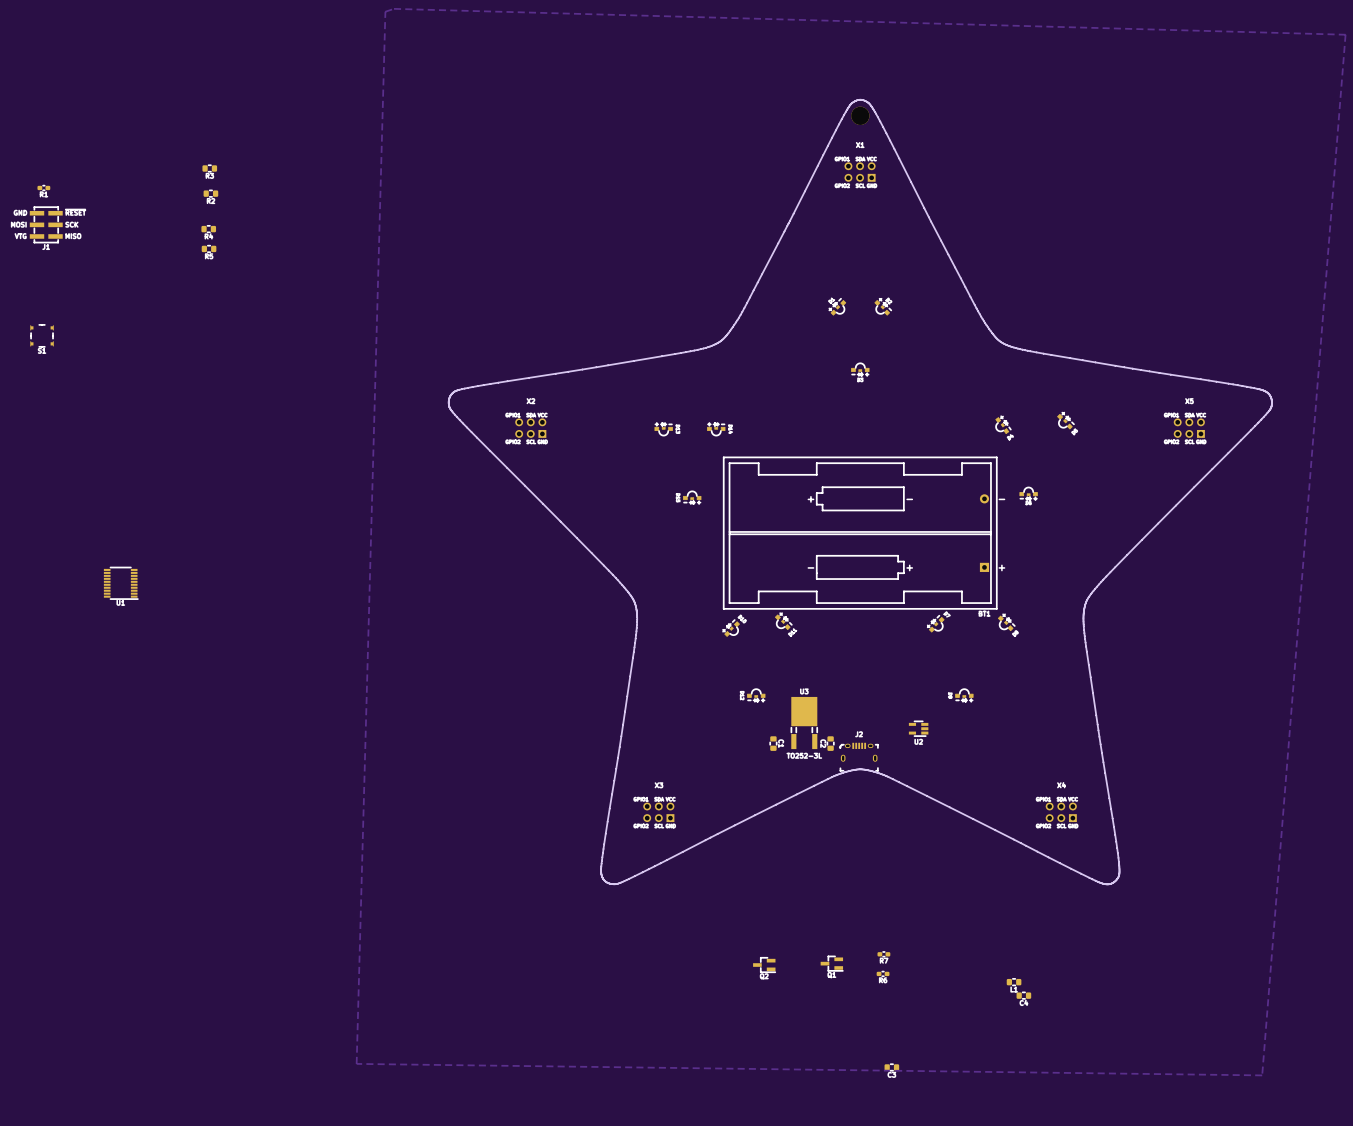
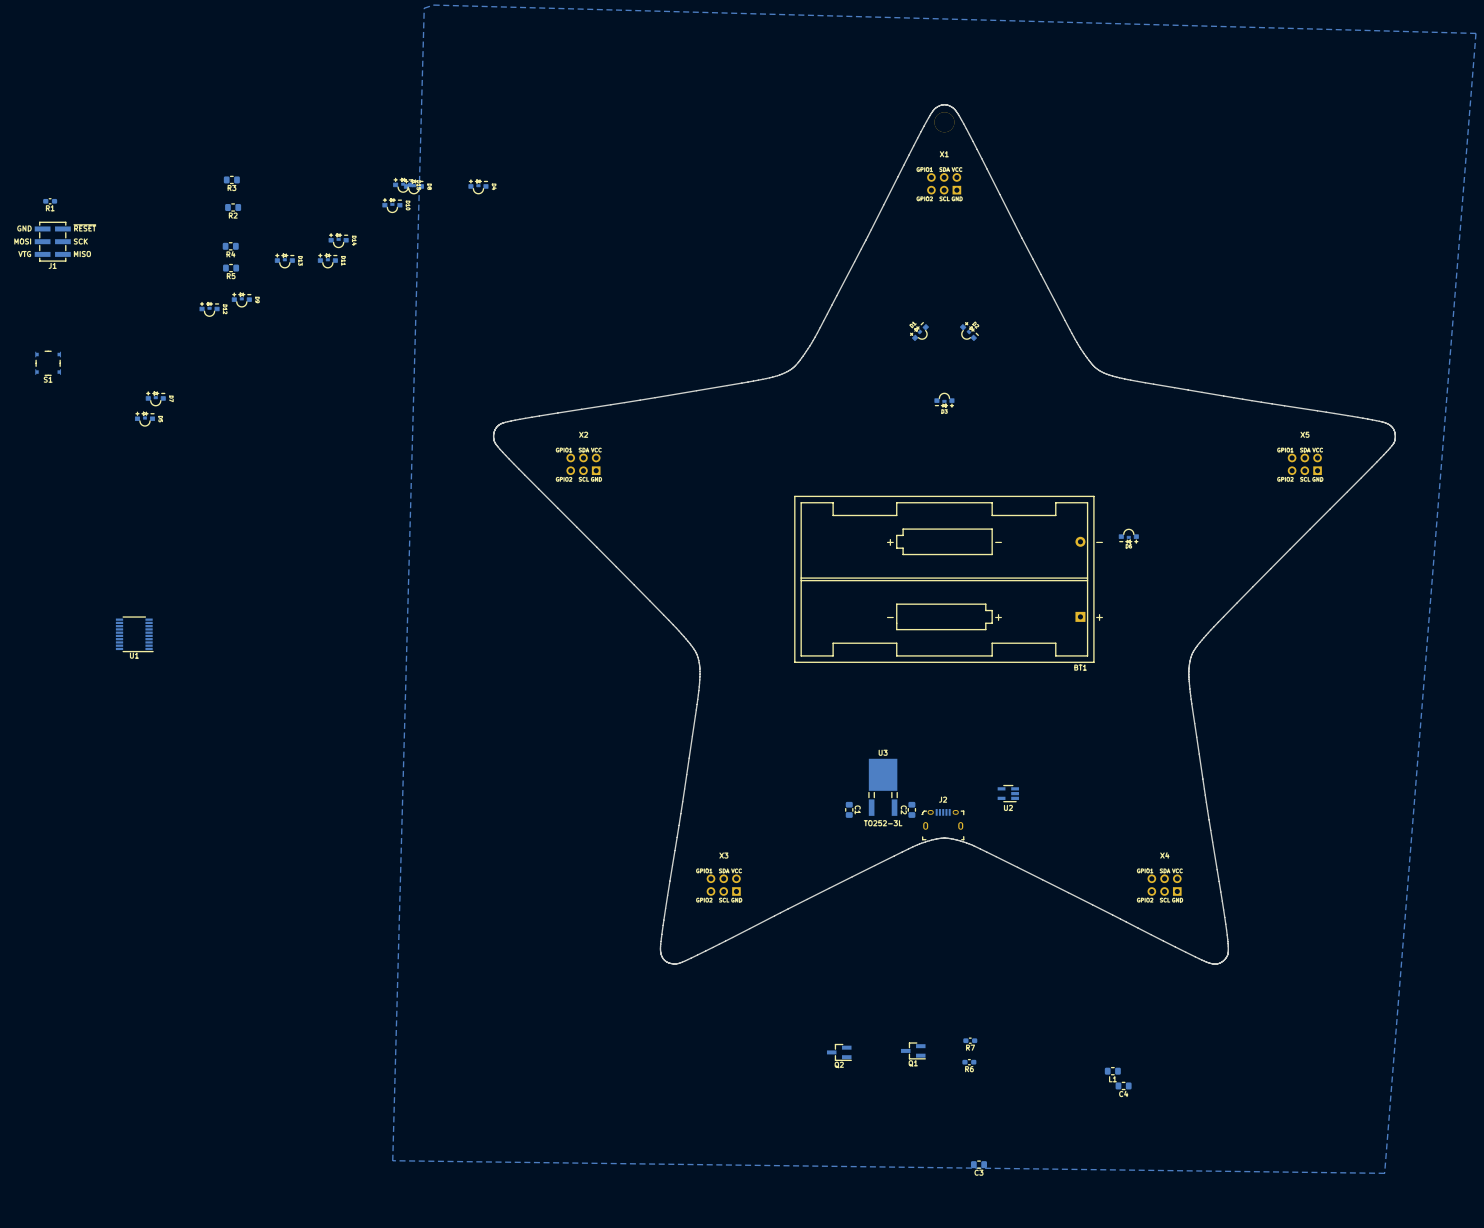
part rotation: 0° (1065, 420) -> 45° counterclockwise (144, 419)
part position: (1065, 420) -> (144, 419)
part rotation: 0° (1003, 424) -> 54° counterclockwise (478, 186)
part position: (1003, 424) -> (478, 186)
part position: (663, 429) -> (284, 260)
part position: (716, 429) -> (338, 240)
part rotation: 0° (692, 497) -> 180° (403, 185)
part position: (692, 497) -> (403, 185)
part rotation: 0° (783, 621) -> 45° counterclockwise (327, 260)
part position: (783, 621) -> (327, 260)
part rotation: 0° (1006, 622) -> 45° counterclockwise (413, 186)
part position: (1006, 622) -> (413, 186)
part rotation: 0° (935, 623) -> 45° clockwise (155, 398)
part position: (935, 623) -> (155, 398)
part rotation: 0° (731, 628) -> 45° clockwise (392, 205)
part position: (731, 628) -> (392, 205)
part rotation: 0° (756, 695) -> 180° (209, 309)
part position: (756, 695) -> (209, 309)
part rotation: 0° (964, 695) -> 180° (241, 299)
part position: (964, 695) -> (241, 299)

